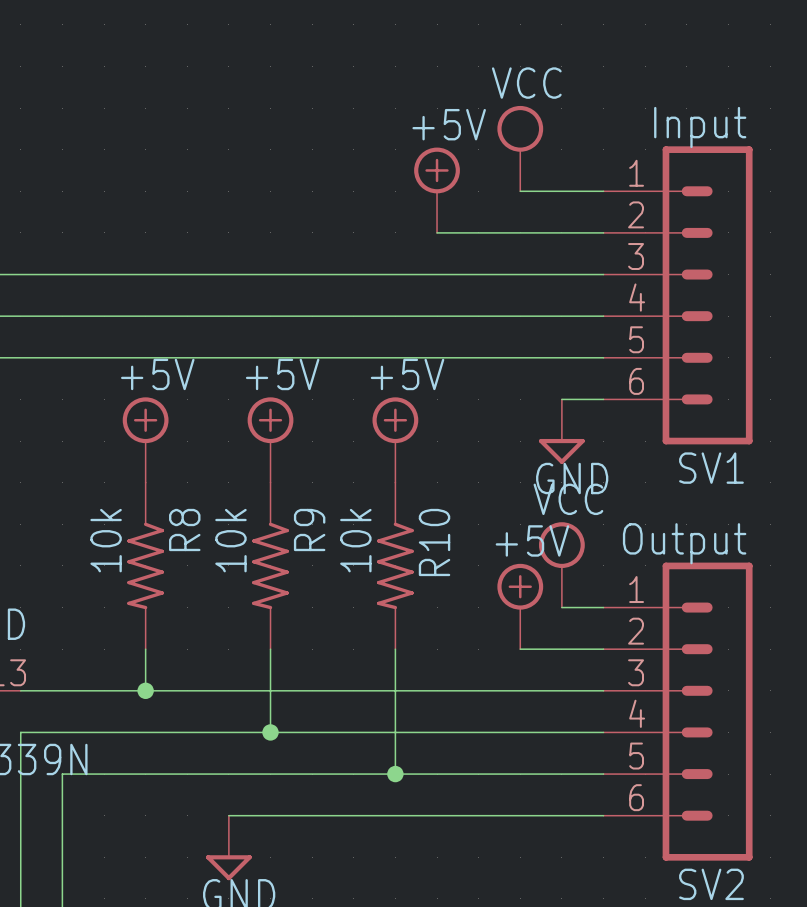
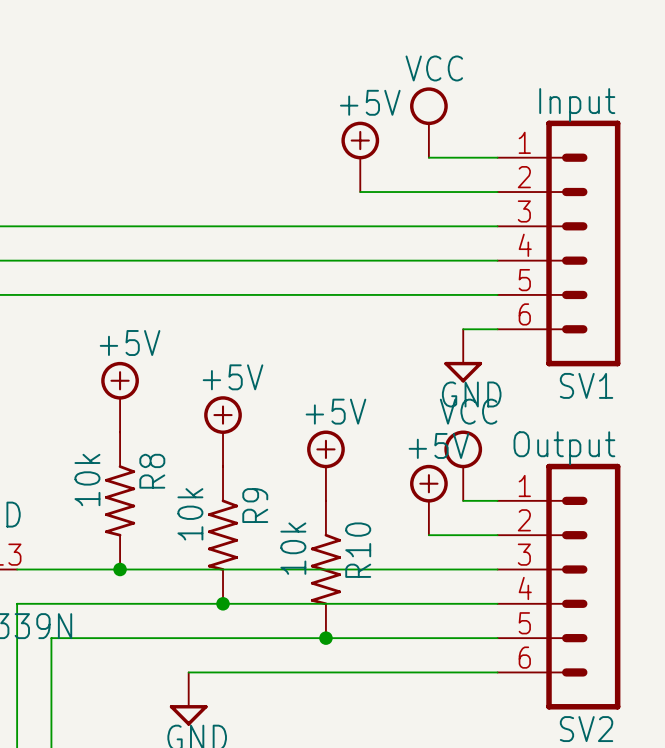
power symbol position: +5V (145, 440) -> +5V (120, 397)
power symbol: +5V (270, 440) -> none
power symbol: +5V (395, 440) -> none
power symbol: none -> +5V (223, 431)
power symbol: none -> +5V (325, 465)
R8 position: (145, 565) -> (120, 500)
R9 position: (270, 565) -> (223, 535)
R10 position: (395, 565) -> (325, 569)

